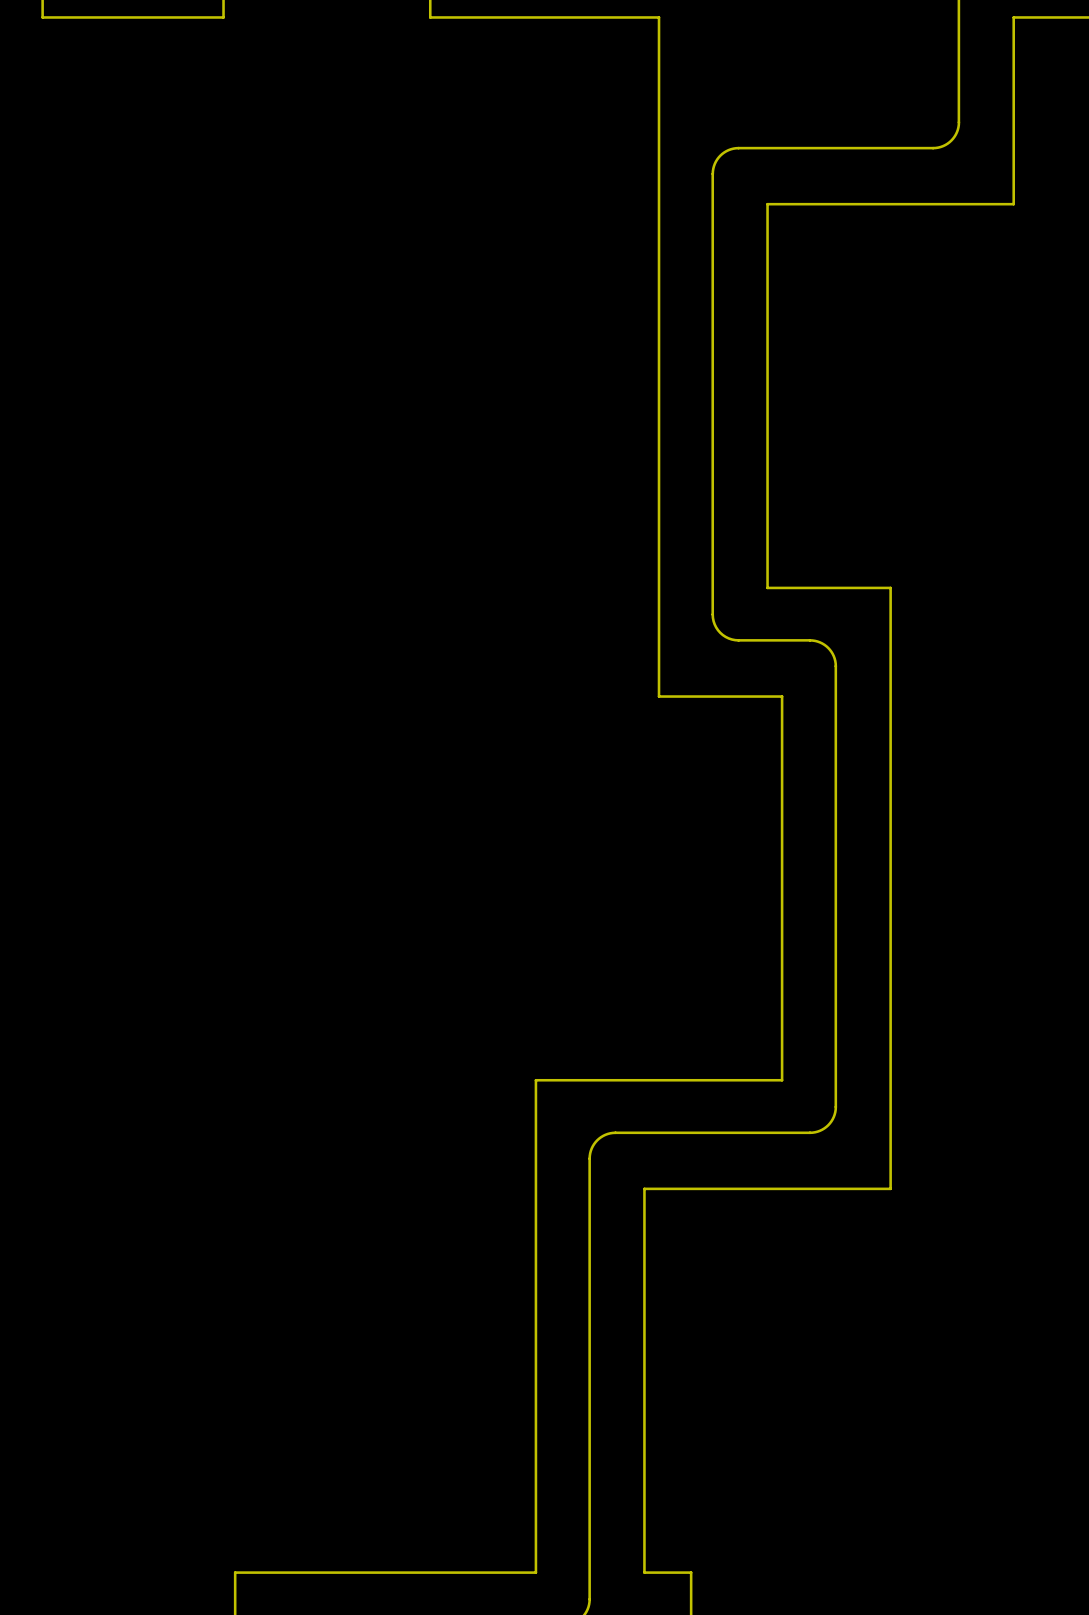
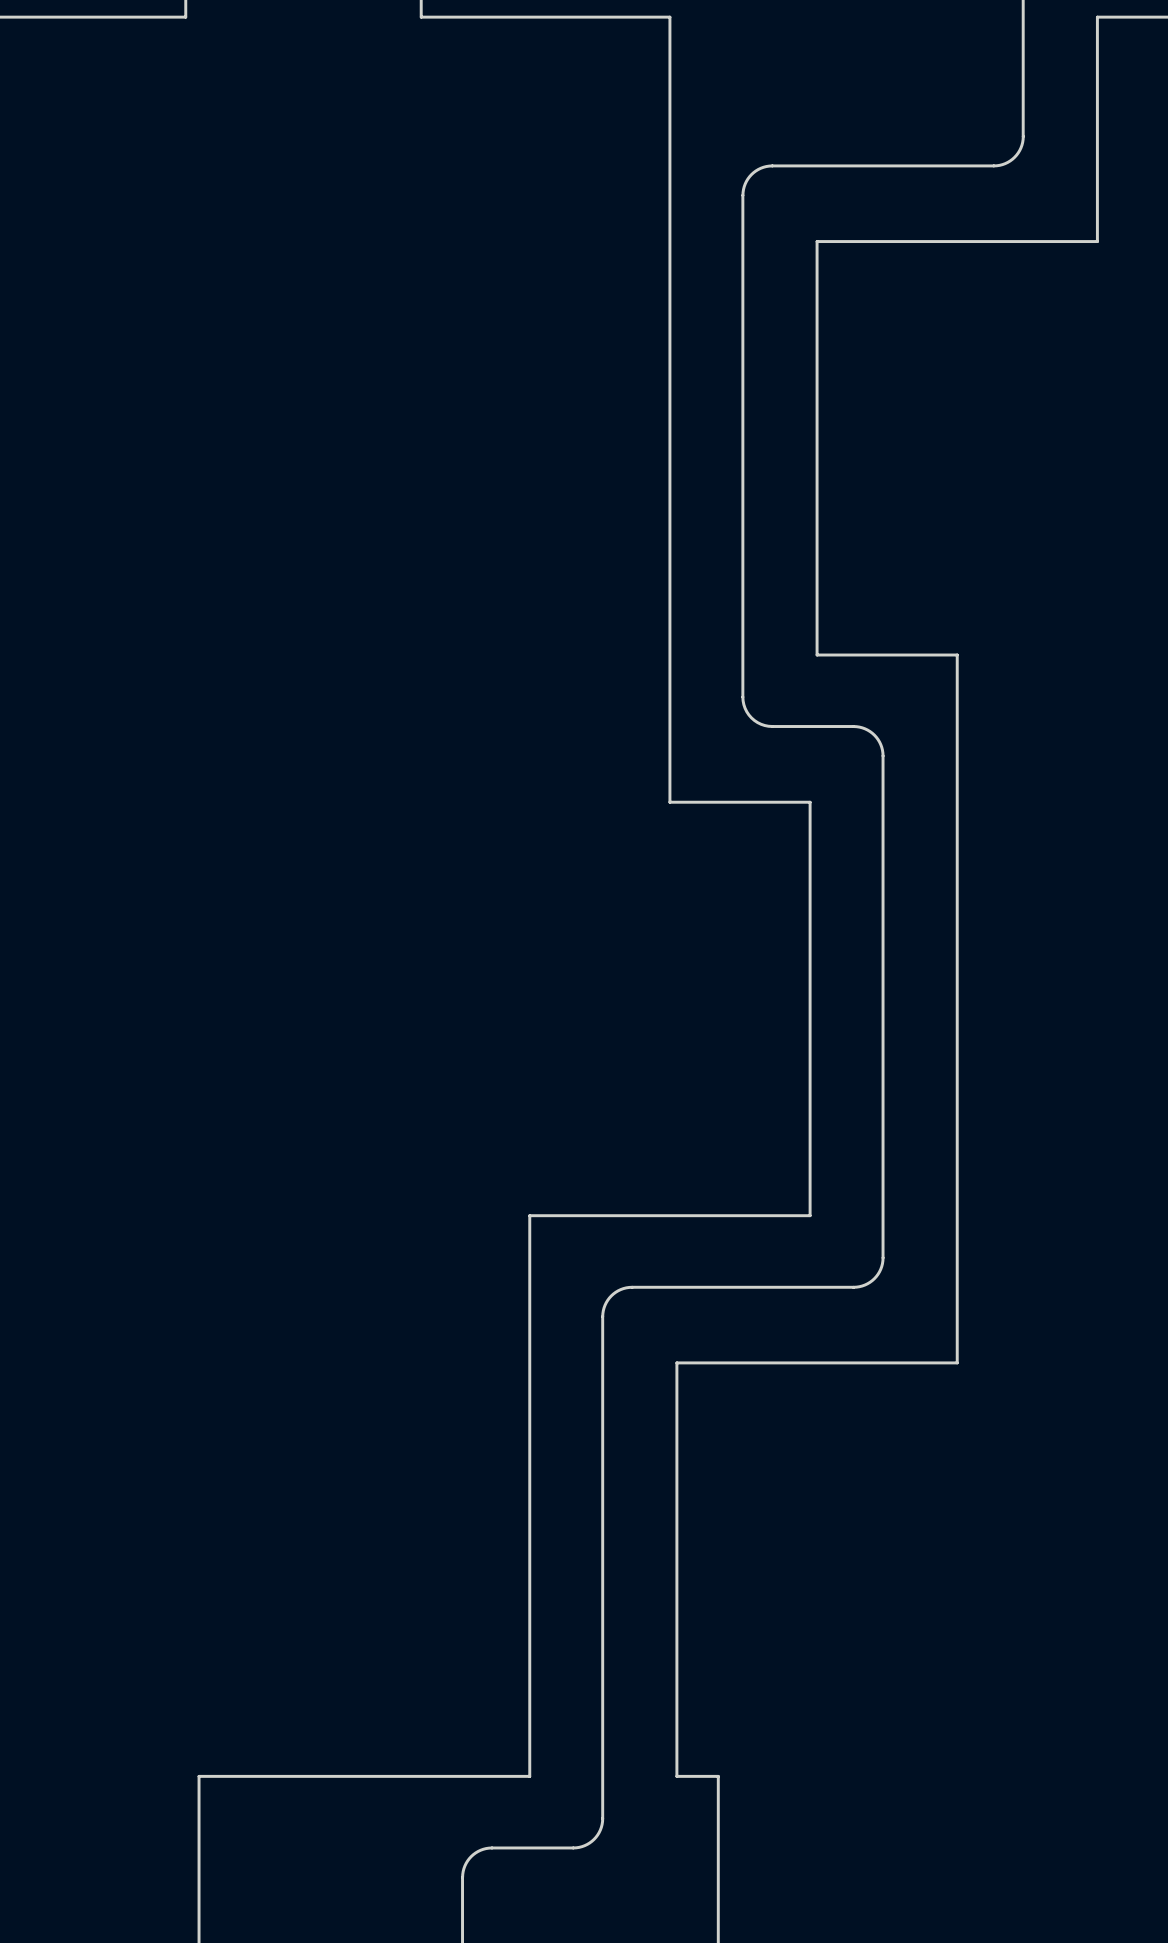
board edge: (648, 17) (659, 17) (659, 696) (782, 696) (782, 1080) (535, 1080) (535, 1572) (235, 1572) -> (669, 17) (669, 802) (810, 802) (810, 1215) (529, 1215) (529, 1776) (199, 1776) (199, 1788)
board edge: (1024, 17) (1013, 17) (1013, 204) (767, 204) (767, 587) (890, 587) (890, 1188) (644, 1188) (644, 1572) (691, 1572) -> (1097, 17) (1097, 241) (817, 241) (817, 655) (957, 655) (957, 1362) (676, 1362) (676, 1776) (718, 1776) (718, 1788)

